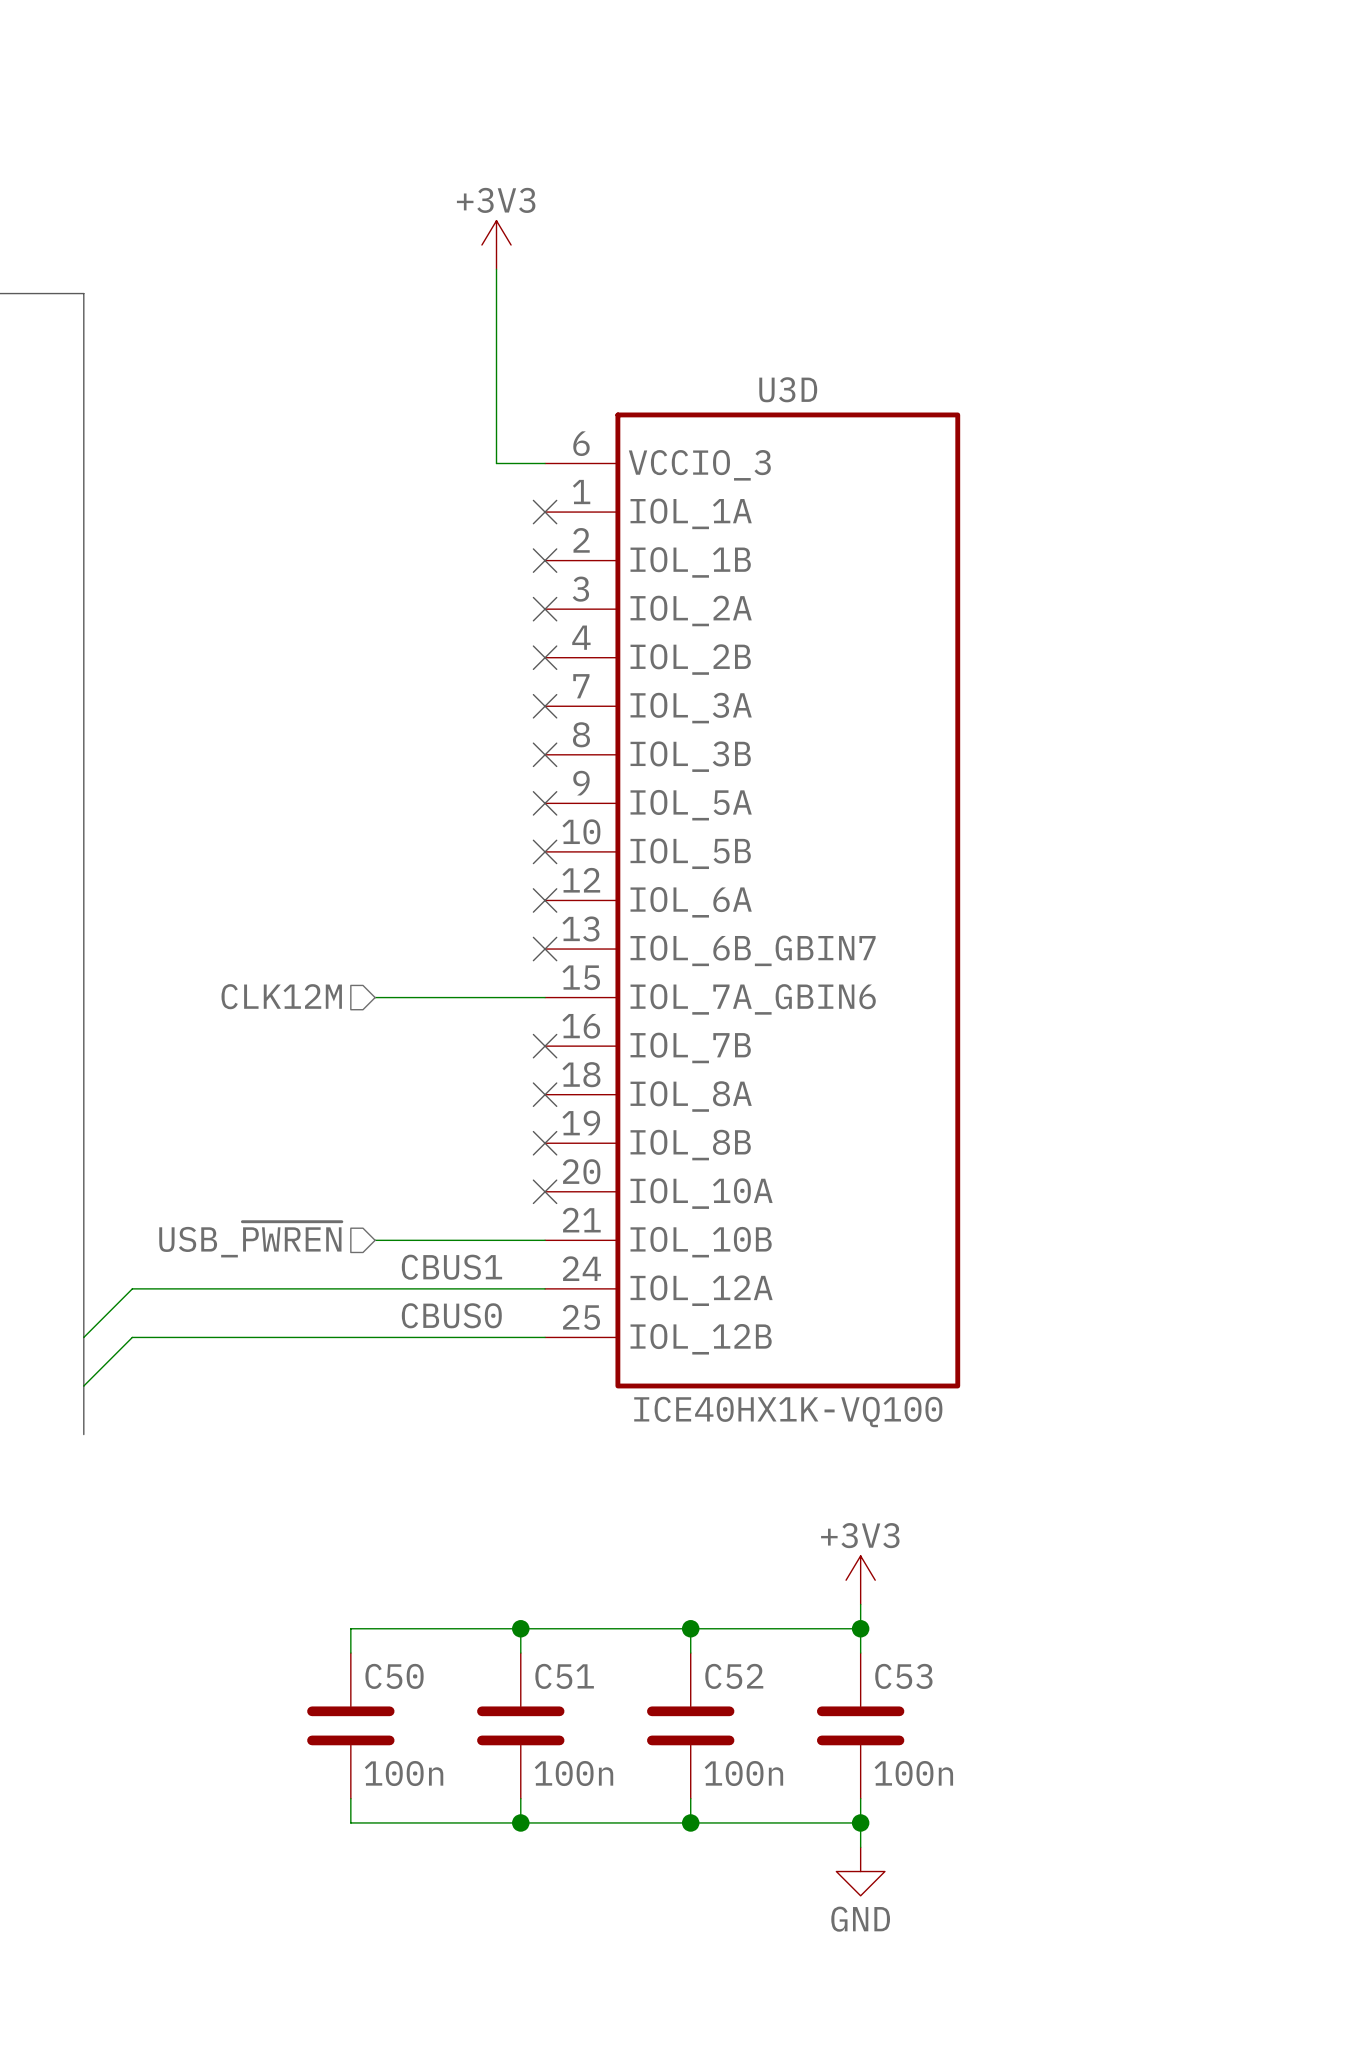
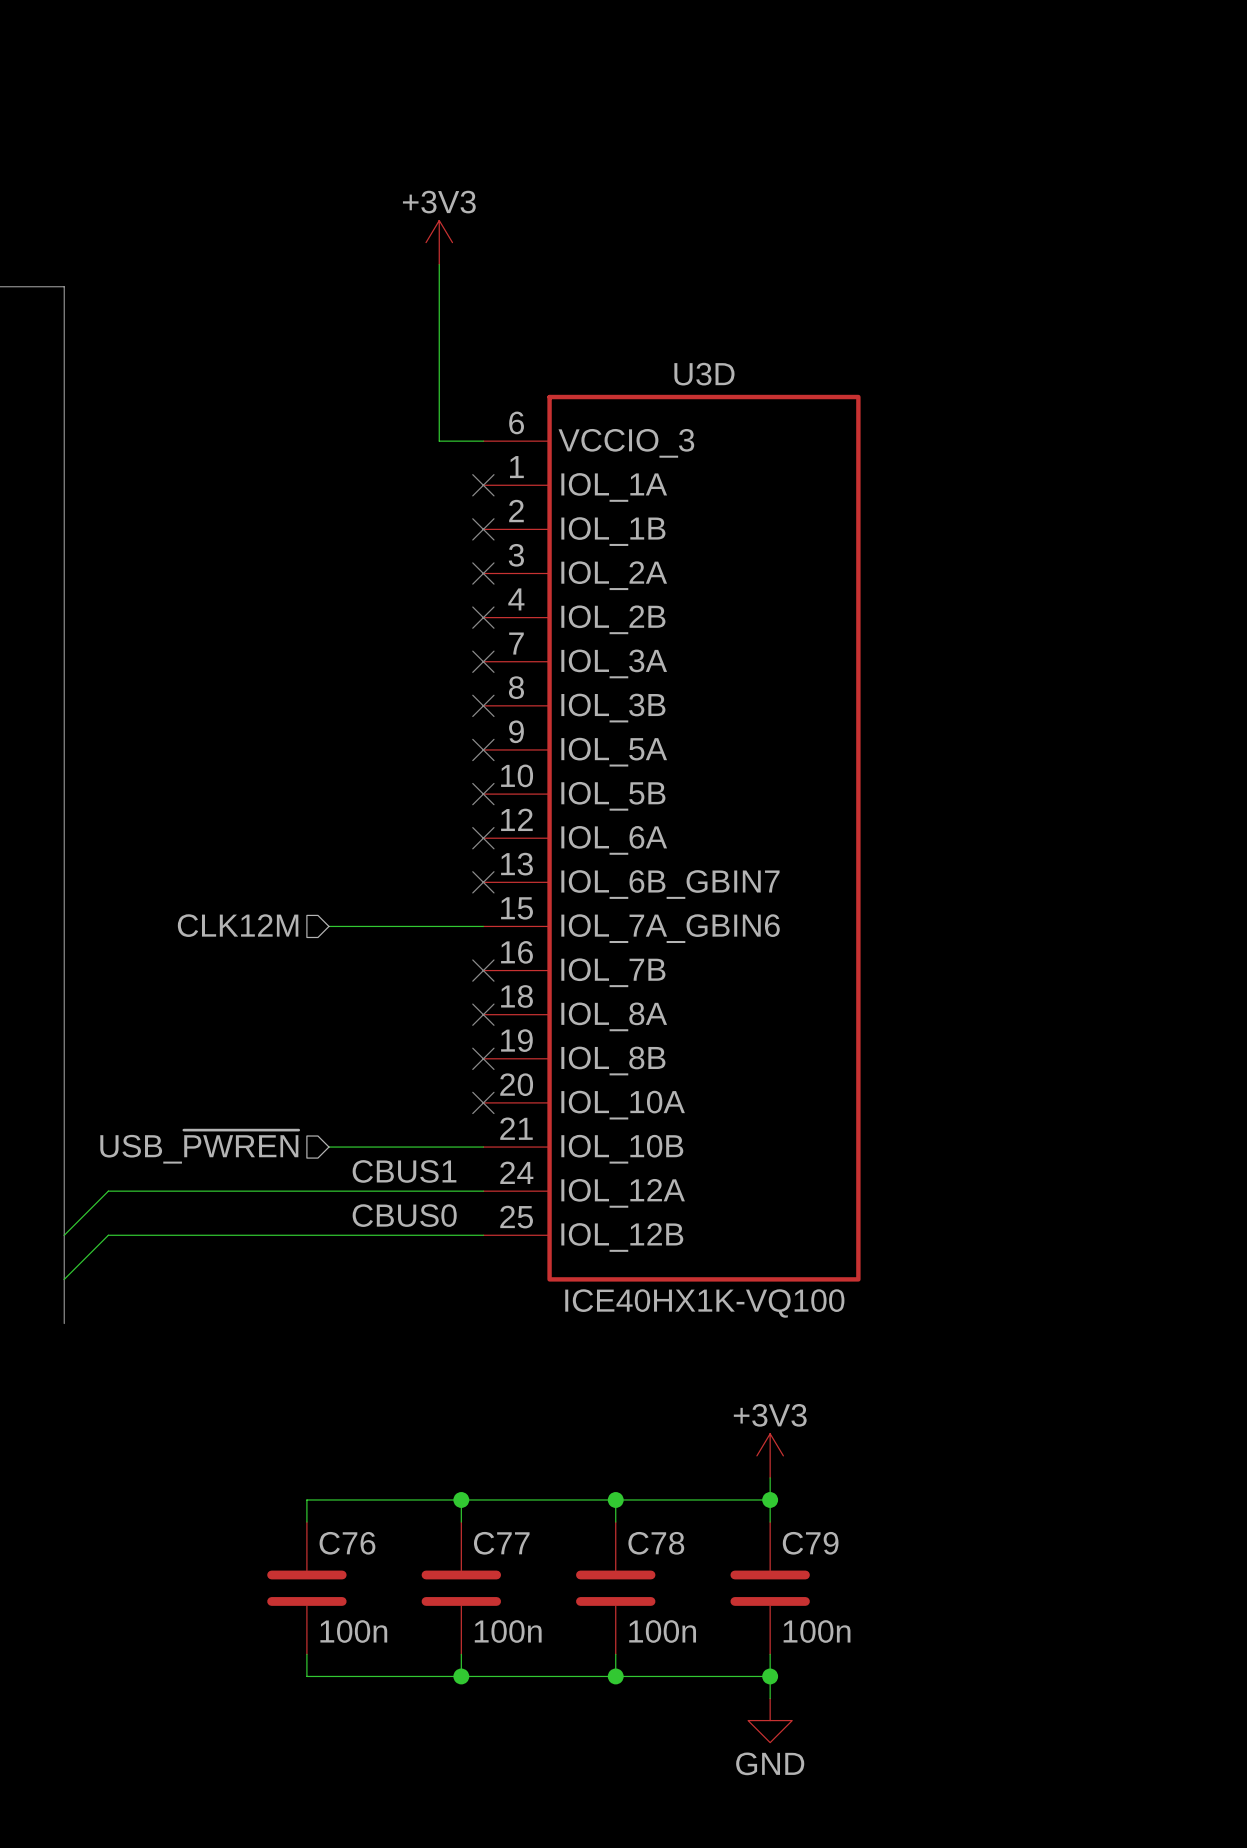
C50 name: C50 (394, 1676) -> C76 (347, 1543)
C51 name: C51 (564, 1676) -> C77 (501, 1543)
C52 name: C52 (734, 1676) -> C78 (656, 1543)
C53 name: C53 (903, 1676) -> C79 (810, 1543)

